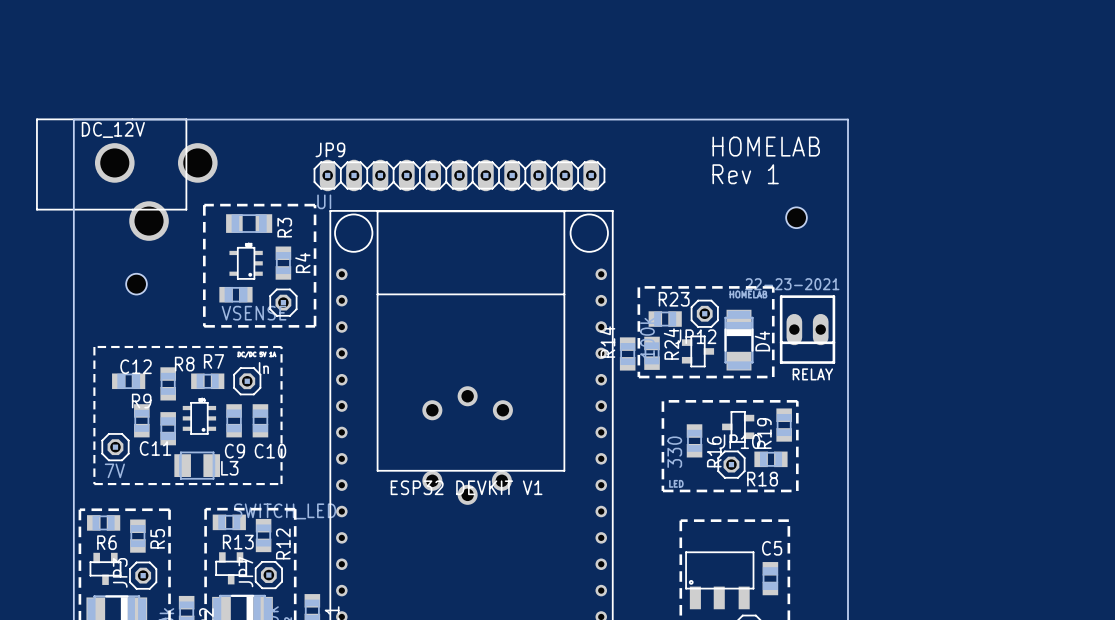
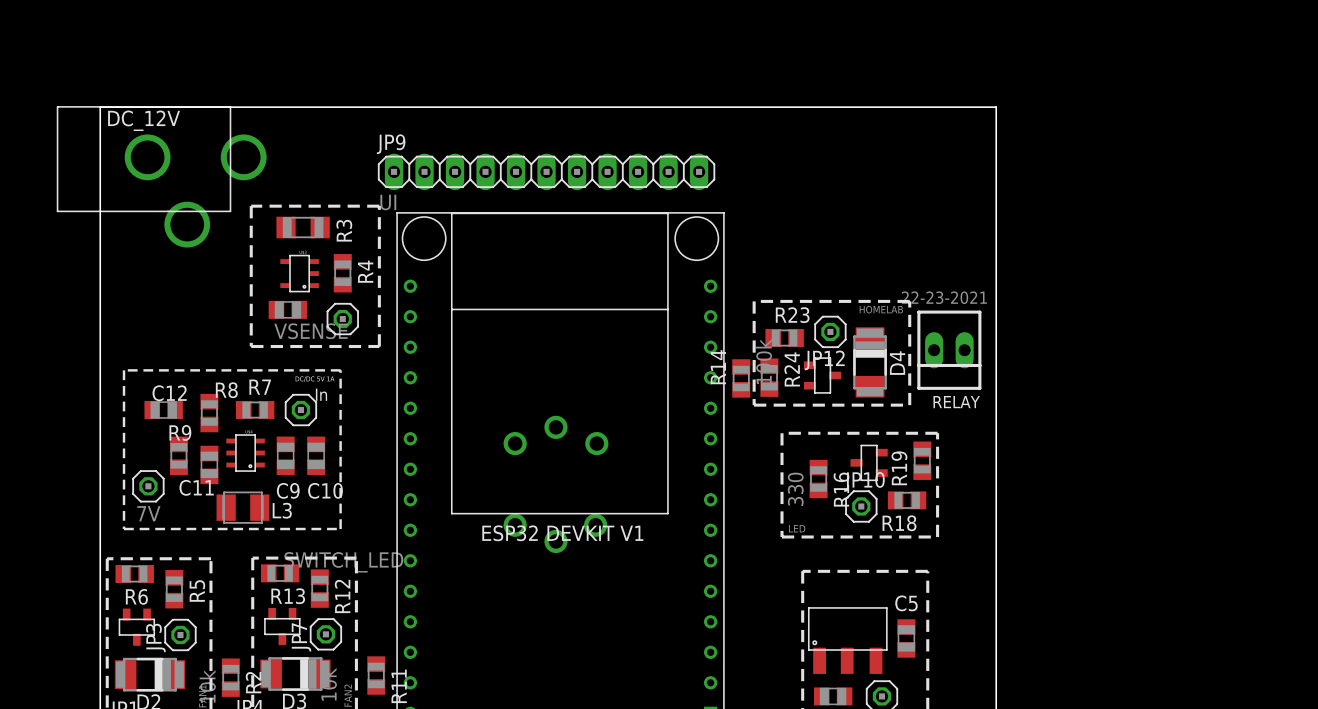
text: HOMELAB (766, 146) -> none
text: Rev 1 (745, 174) -> none
hole: (796, 217) -> none
hole: (136, 284) -> none

